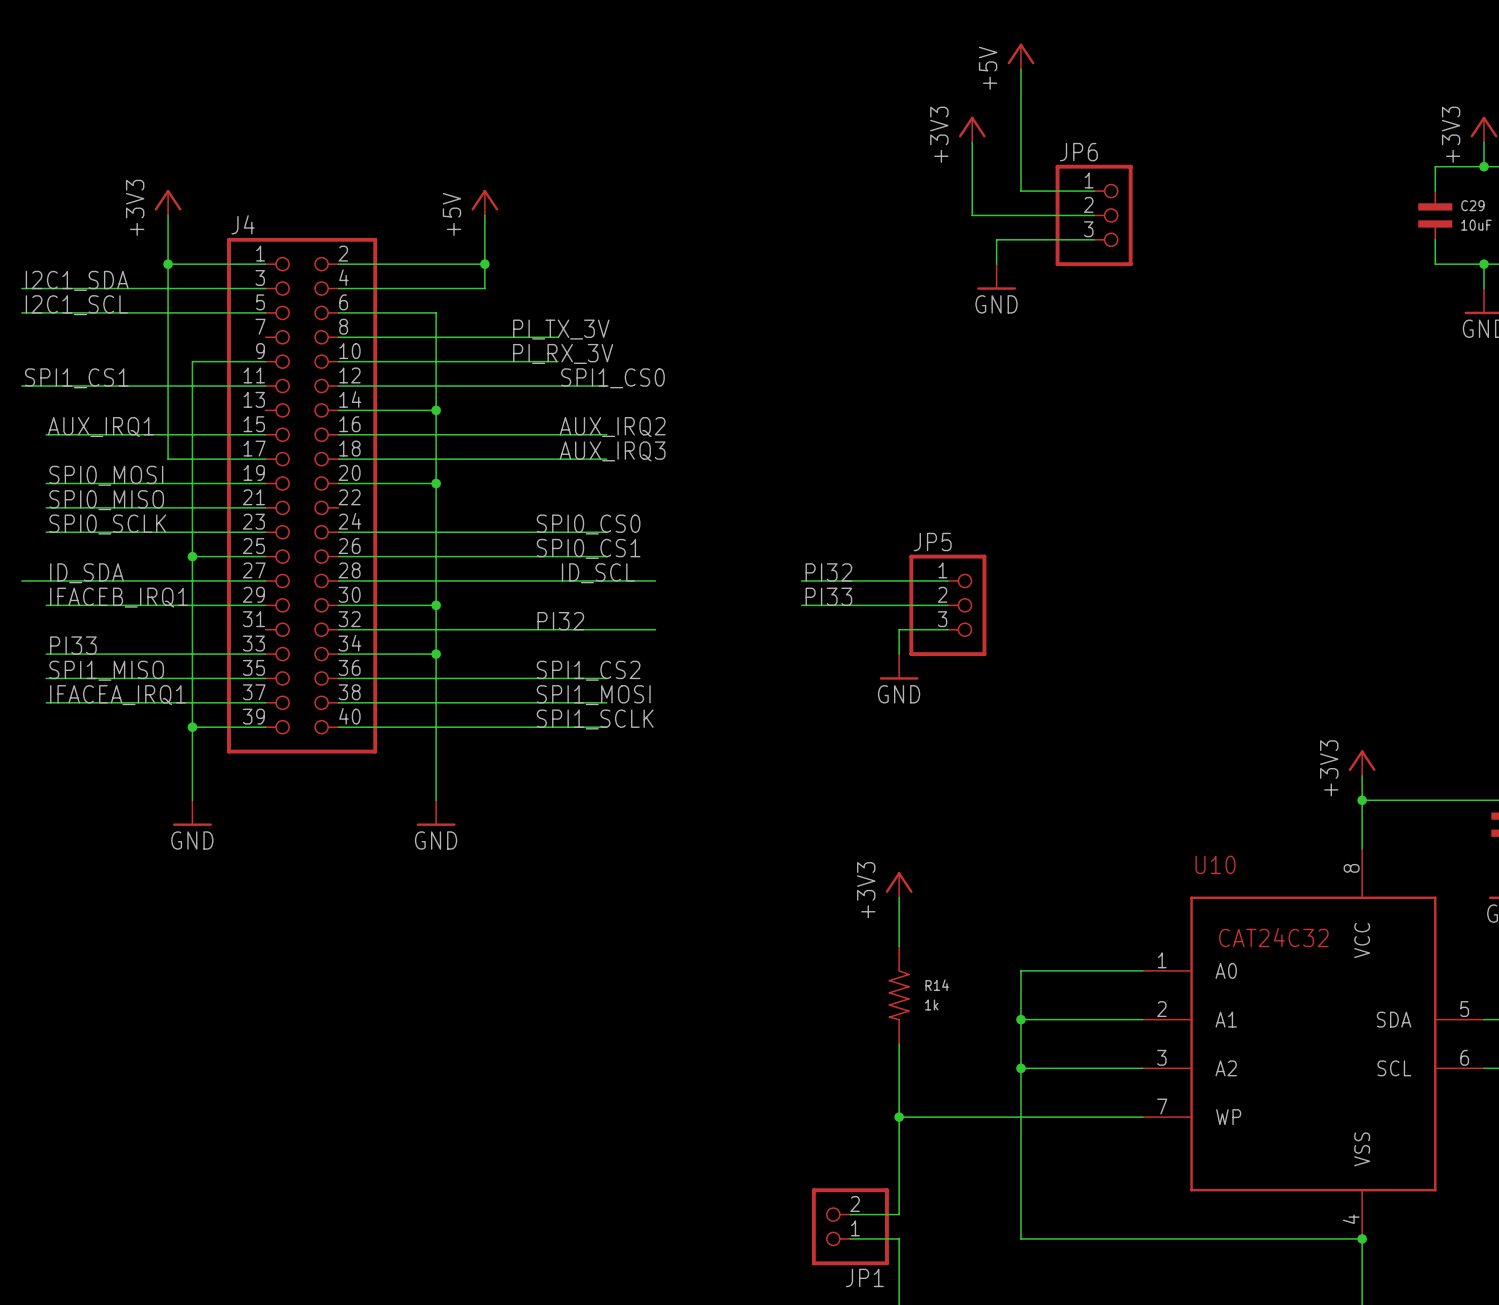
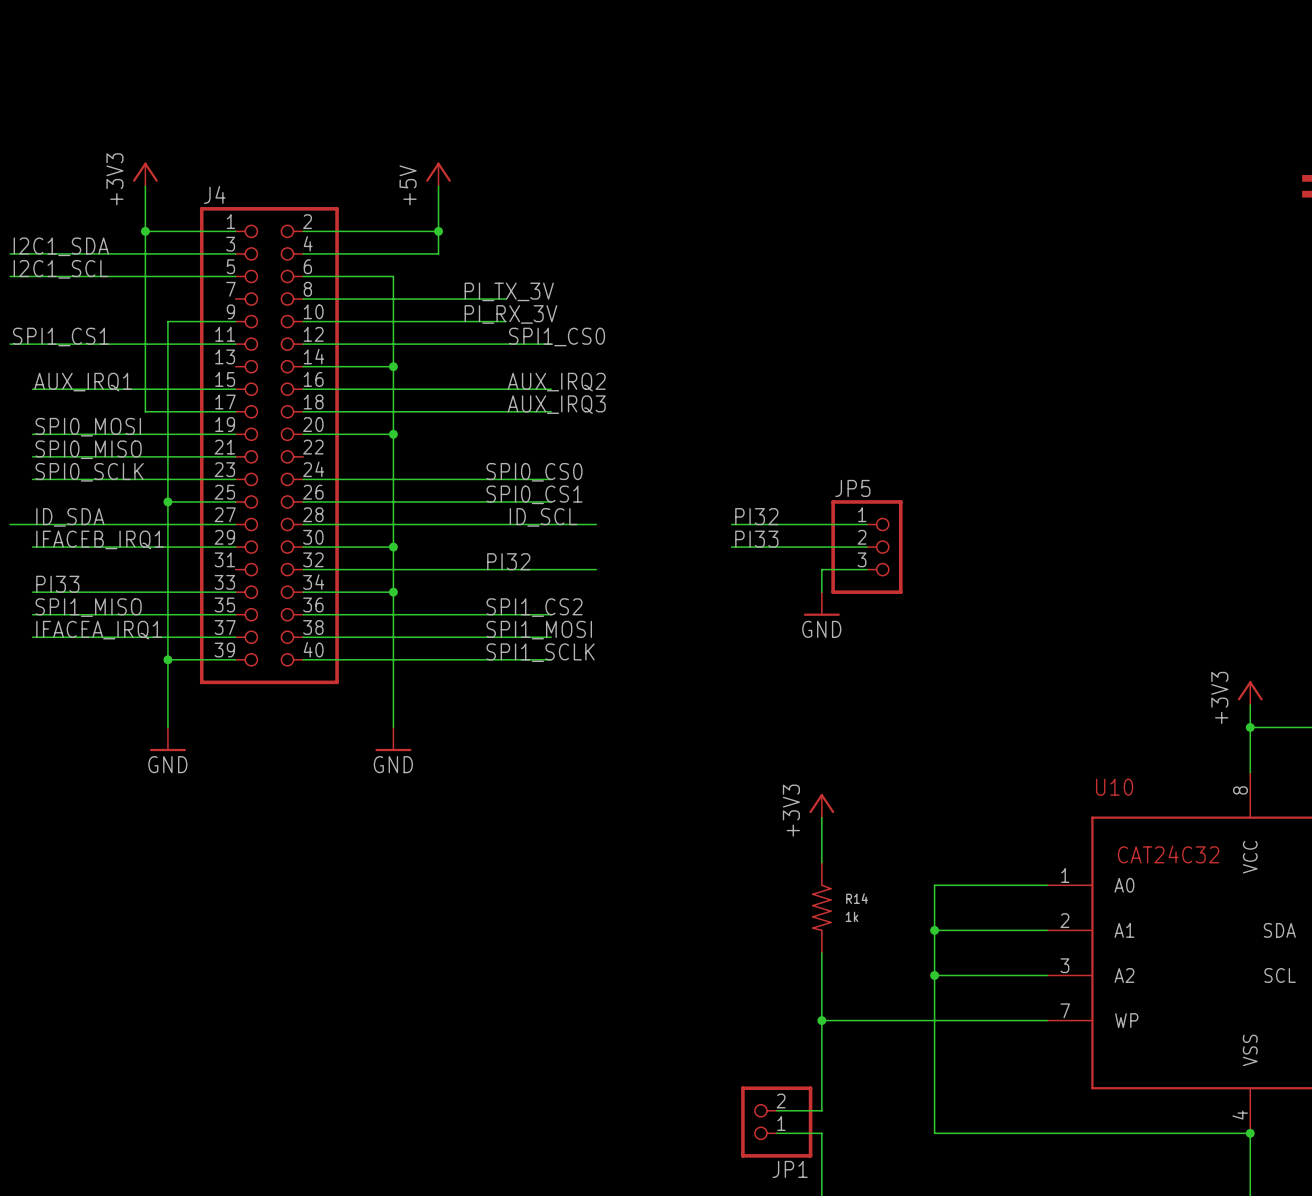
power symbol: +5V (1020, 56) -> none
wire: (1020, 69) (1020, 191) (1094, 191) -> none
power symbol: +3V3 (972, 129) -> none
wire: (972, 142) (972, 215) (1094, 215) -> none
JP6: (1094, 215) -> none
wire: (1094, 239) (996, 239) (996, 264) -> none
power symbol: GND (996, 276) -> none

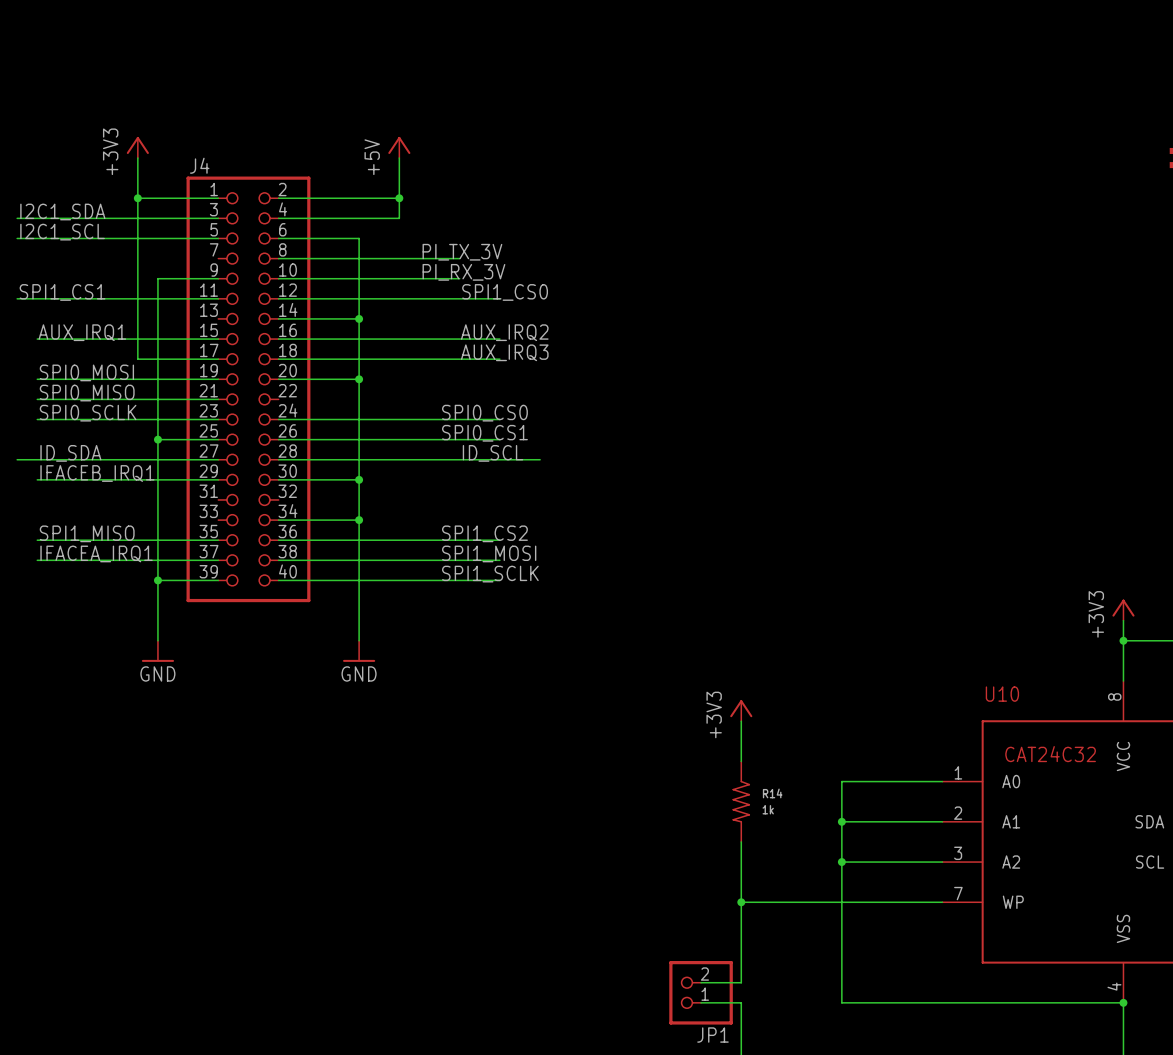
label: PI32 (756, 516) -> none
wire: (731, 524) (866, 524) -> none
label: PI33 (756, 539) -> none
wire: (731, 547) (866, 547) -> none
JP5: (866, 547) -> none
label: PI32 (508, 561) -> none
wire: (303, 569) (596, 569) -> none
wire: (866, 569) (821, 569) (821, 592) -> none
label: PI33 (57, 584) -> none
wire: (32, 592) (235, 592) -> none
power symbol: GND (821, 604) -> none

